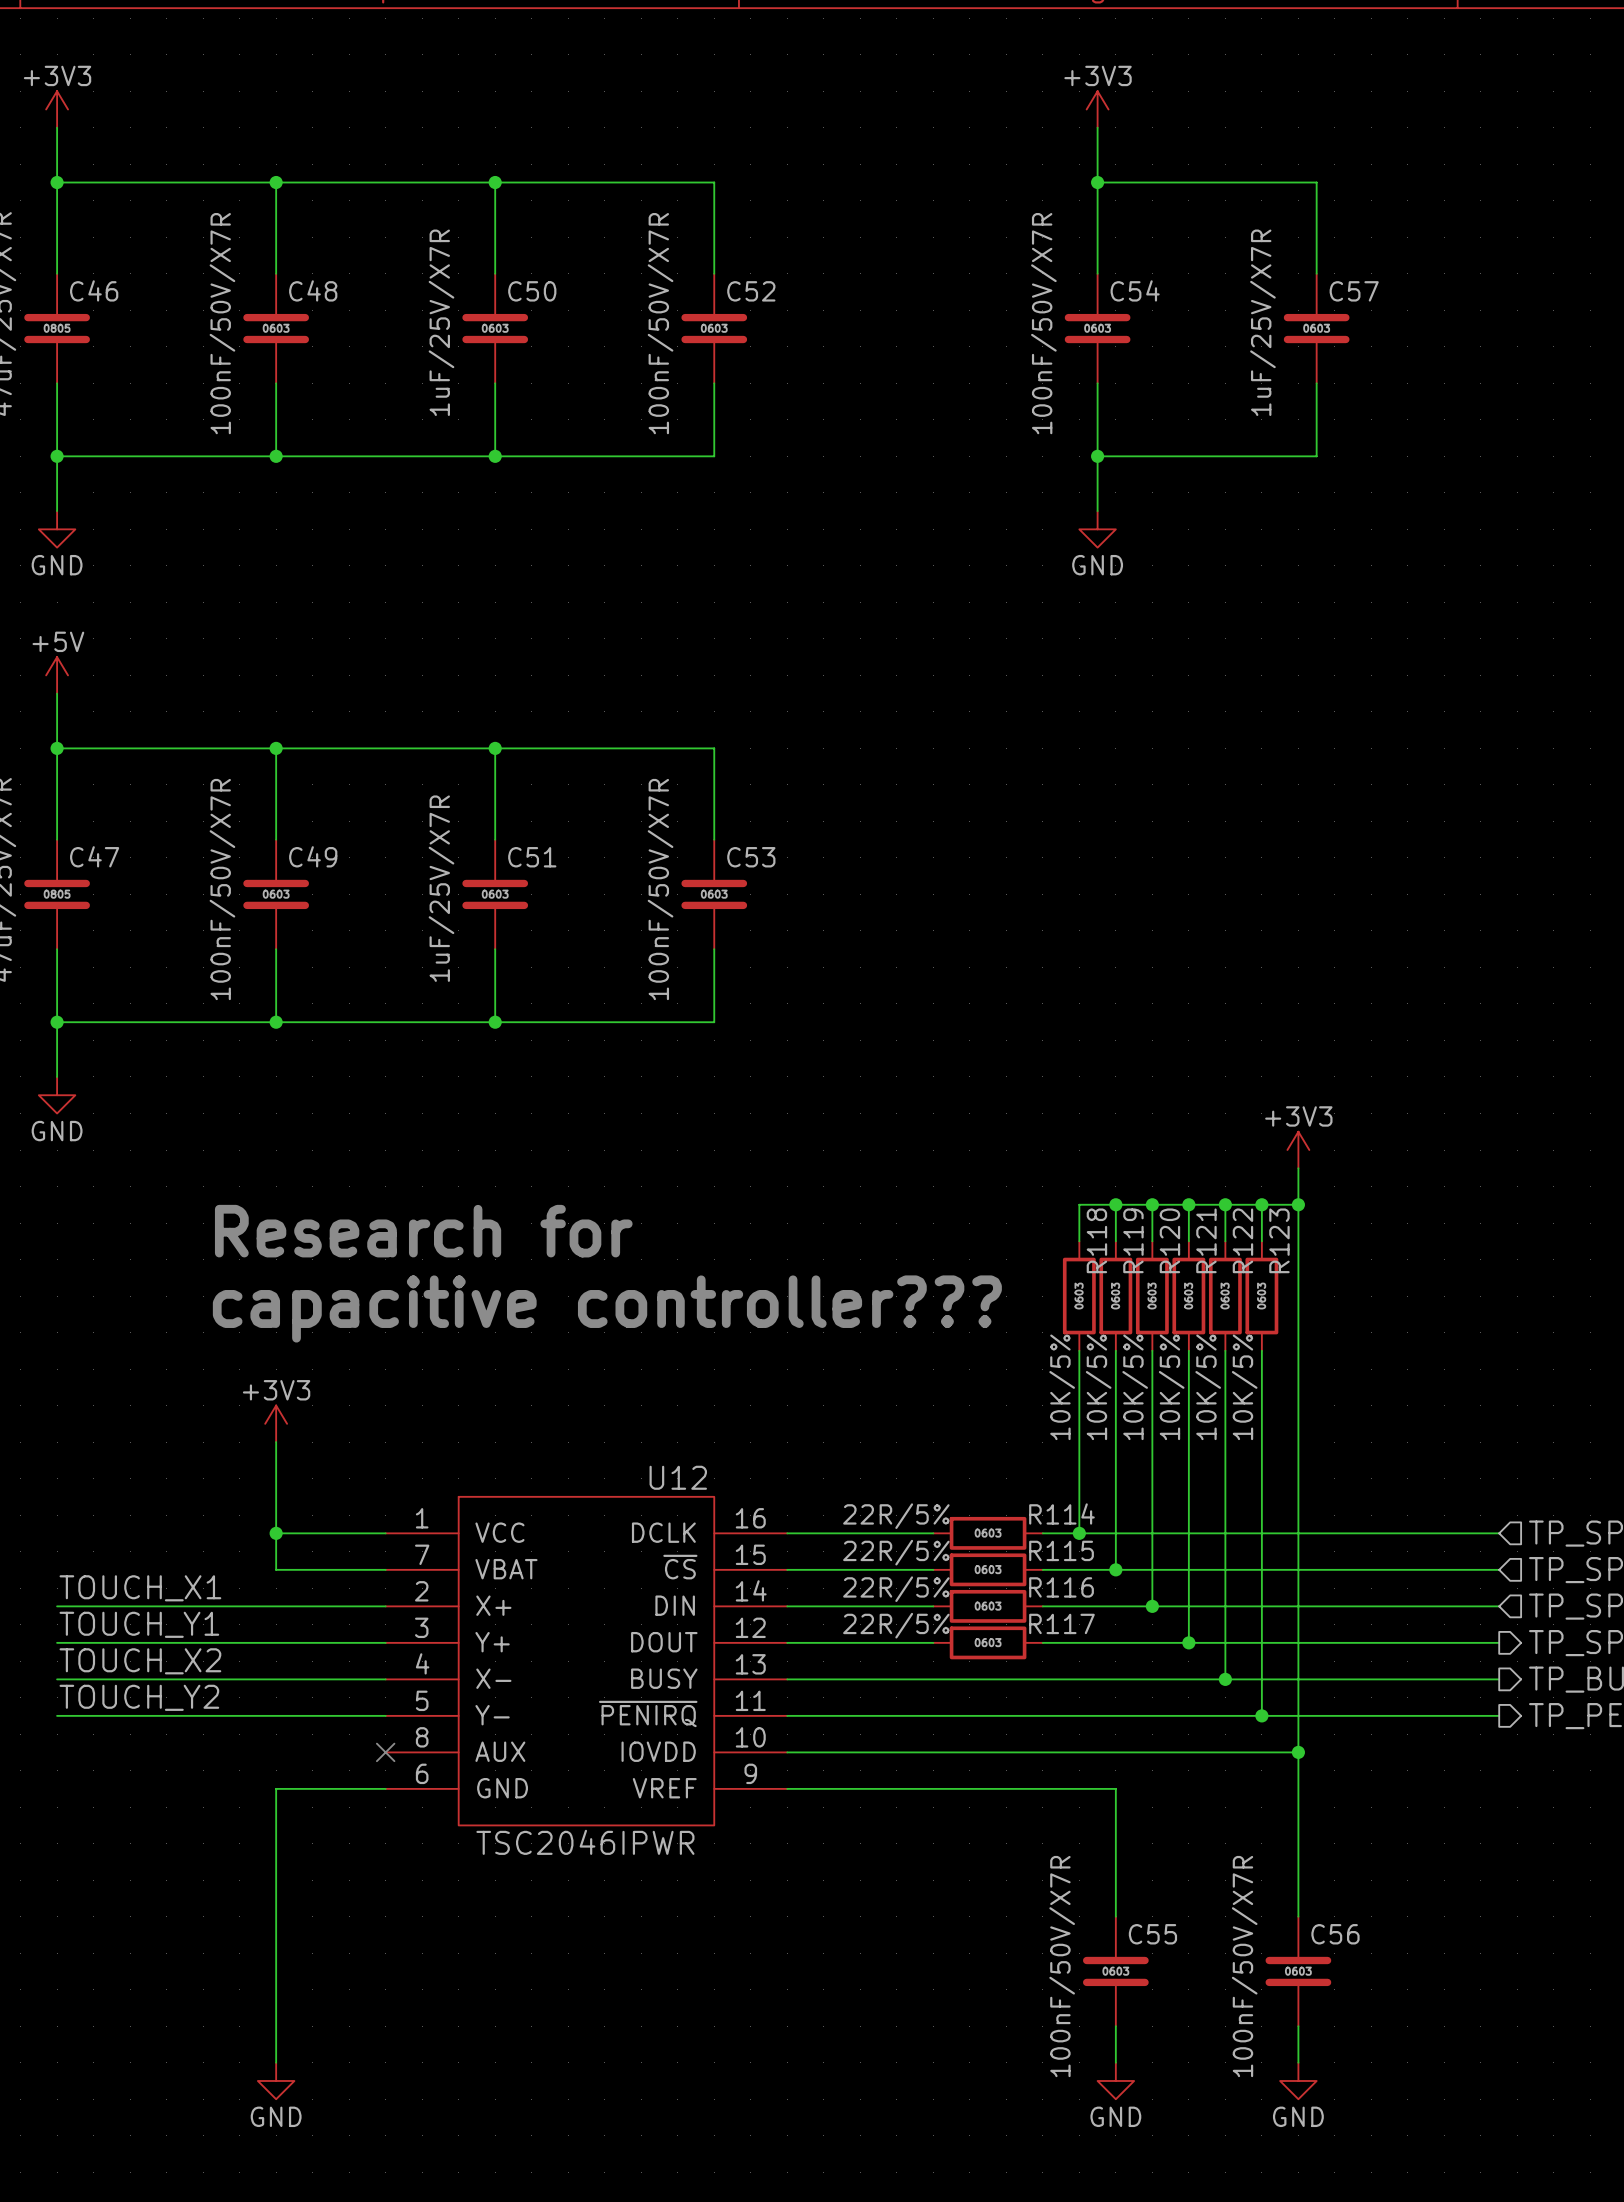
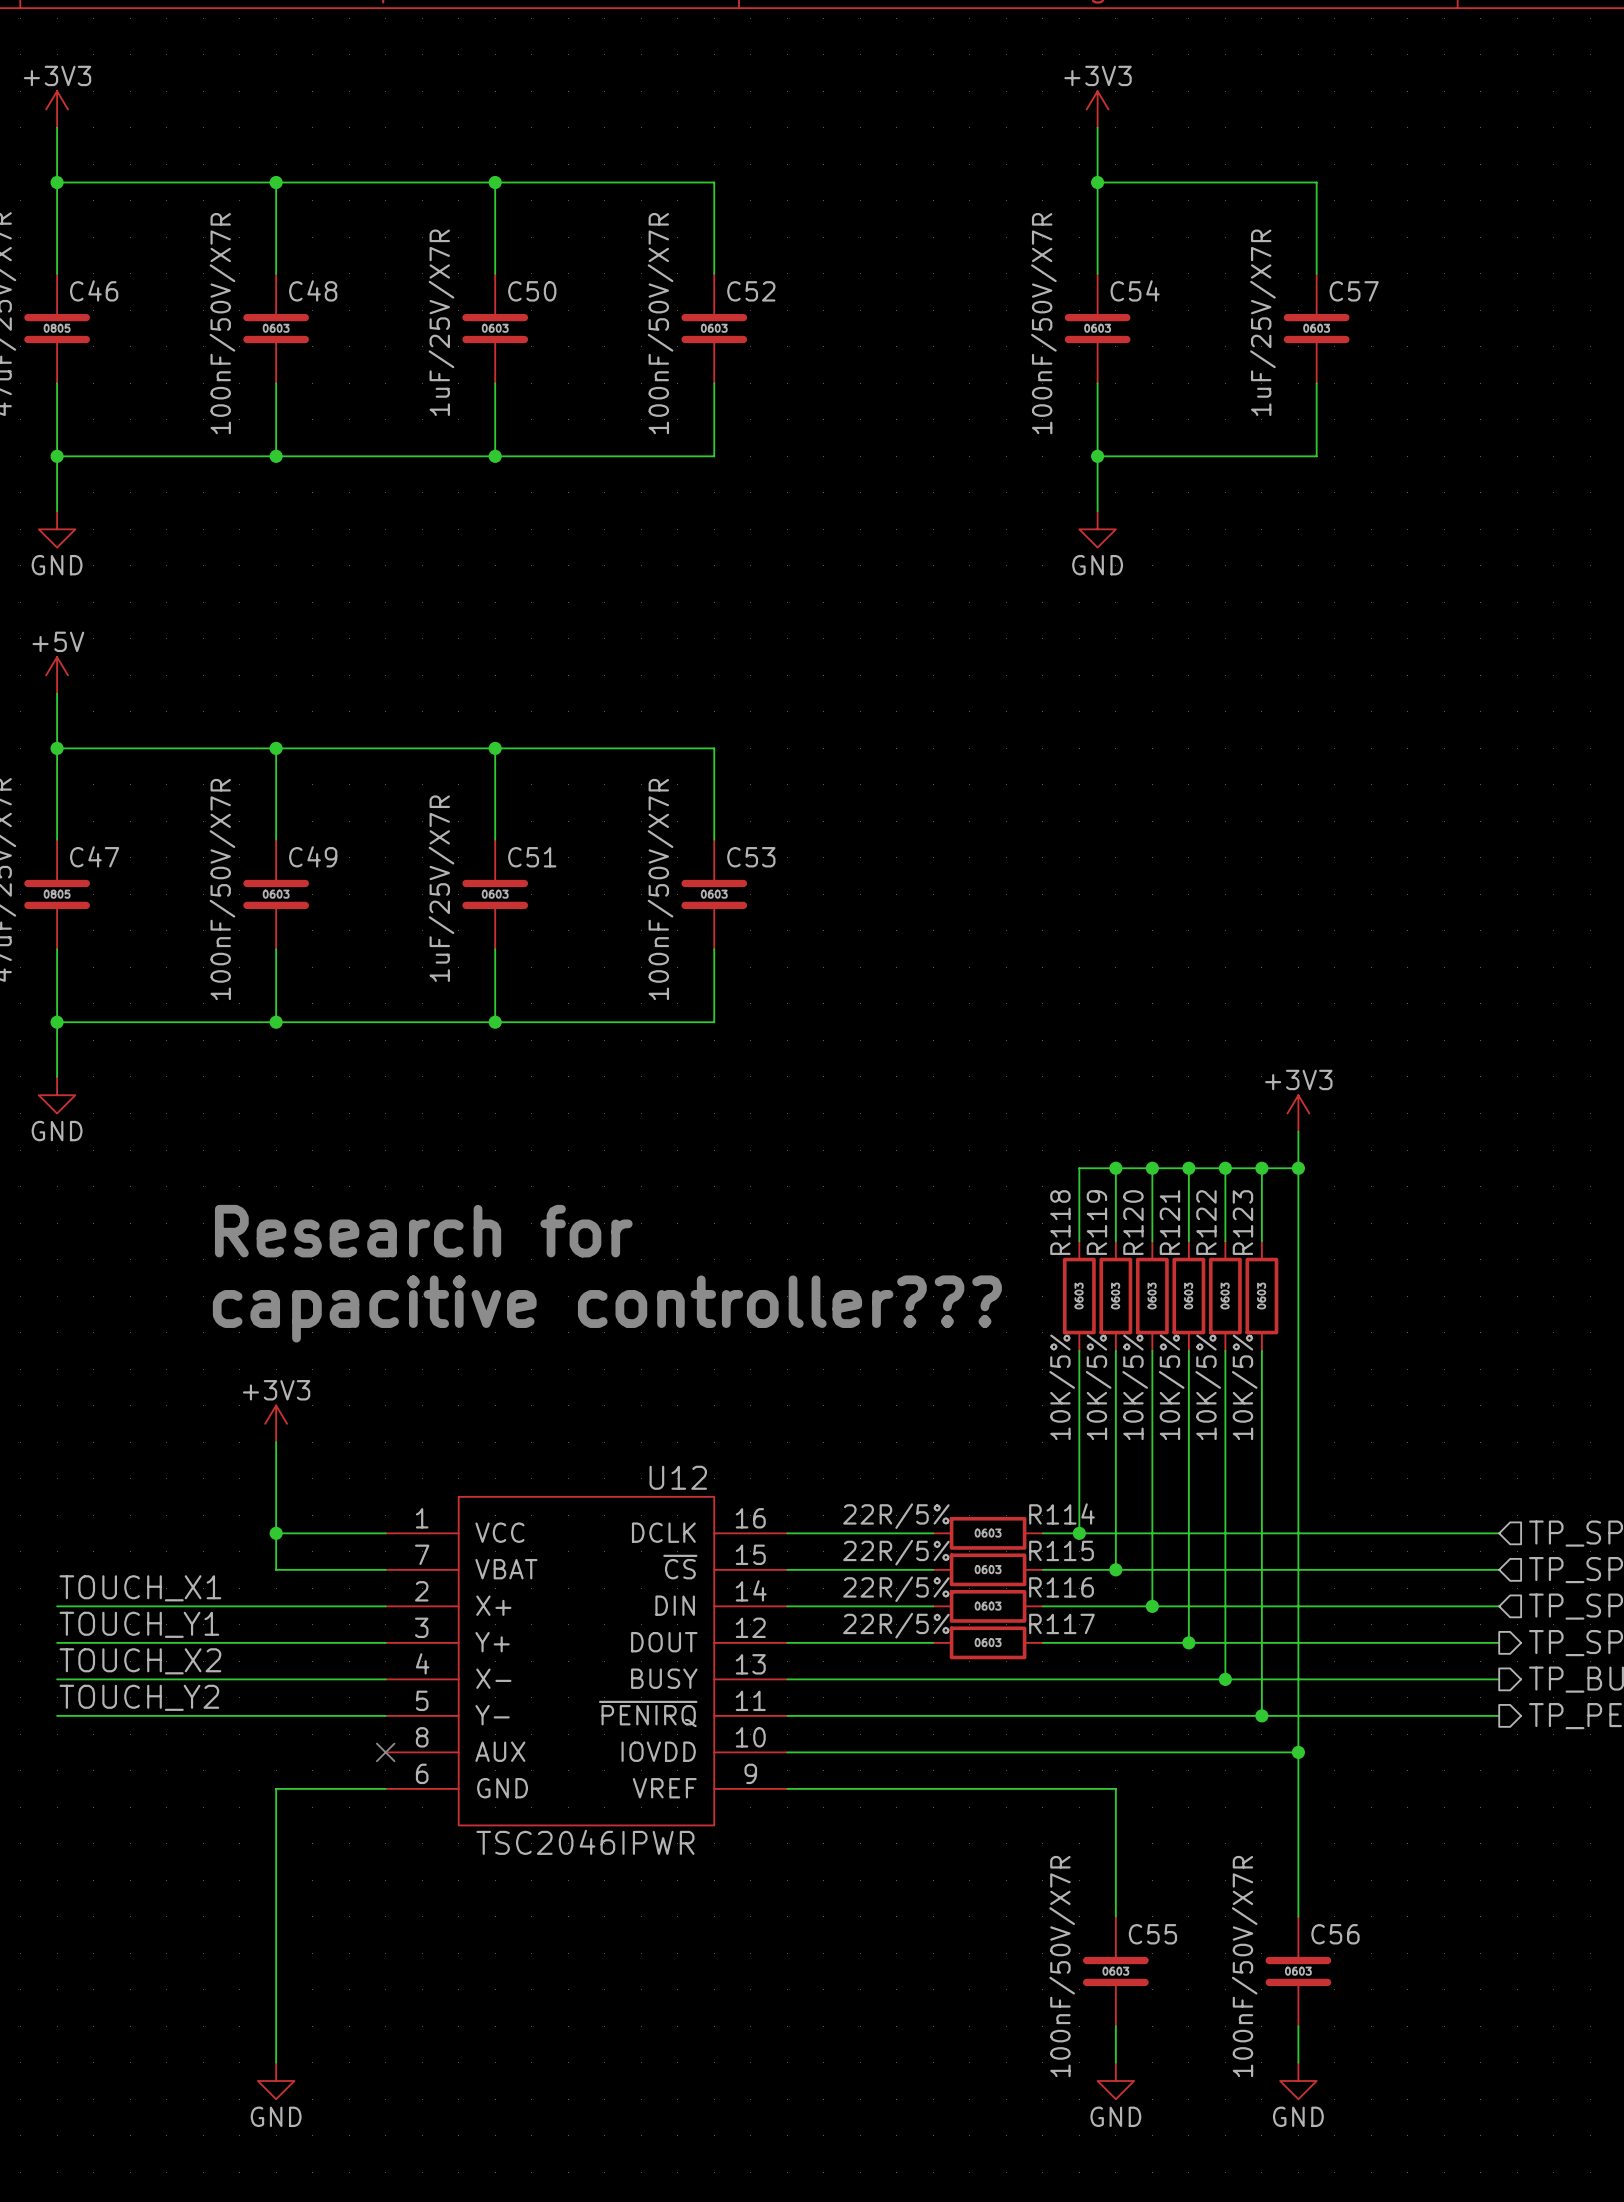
power symbol position: +3V3 (1298, 1150) -> +3V3 (1298, 1113)
wire: none -> (1115, 1168) (1115, 1204)
junction: none -> (1115, 1168)
wire: none -> (1152, 1168) (1152, 1204)
junction: none -> (1152, 1168)
wire: none -> (1188, 1168) (1188, 1204)
junction: none -> (1188, 1168)
wire: none -> (1225, 1168) (1225, 1204)
junction: none -> (1225, 1168)
wire: none -> (1261, 1168) (1261, 1204)
junction: none -> (1261, 1168)
junction: none -> (1298, 1168)
wire: (1079, 1204) (1298, 1204) -> (1079, 1204) (1079, 1168) (1298, 1168) (1298, 1131)
junction: (1115, 1204) -> none
junction: (1152, 1204) -> none
junction: (1188, 1204) -> none
junction: (1225, 1204) -> none
junction: (1261, 1204) -> none
junction: (1298, 1204) -> none
R118 name position: R118 (1096, 1240) -> R118 (1060, 1222)
R119 name position: R119 (1133, 1240) -> R119 (1096, 1222)
R120 name position: R120 (1169, 1240) -> R120 (1133, 1222)
R121 name position: R121 (1206, 1240) -> R121 (1169, 1222)
R122 name position: R122 (1242, 1240) -> R122 (1206, 1222)
R123 name position: R123 (1279, 1240) -> R123 (1242, 1222)

